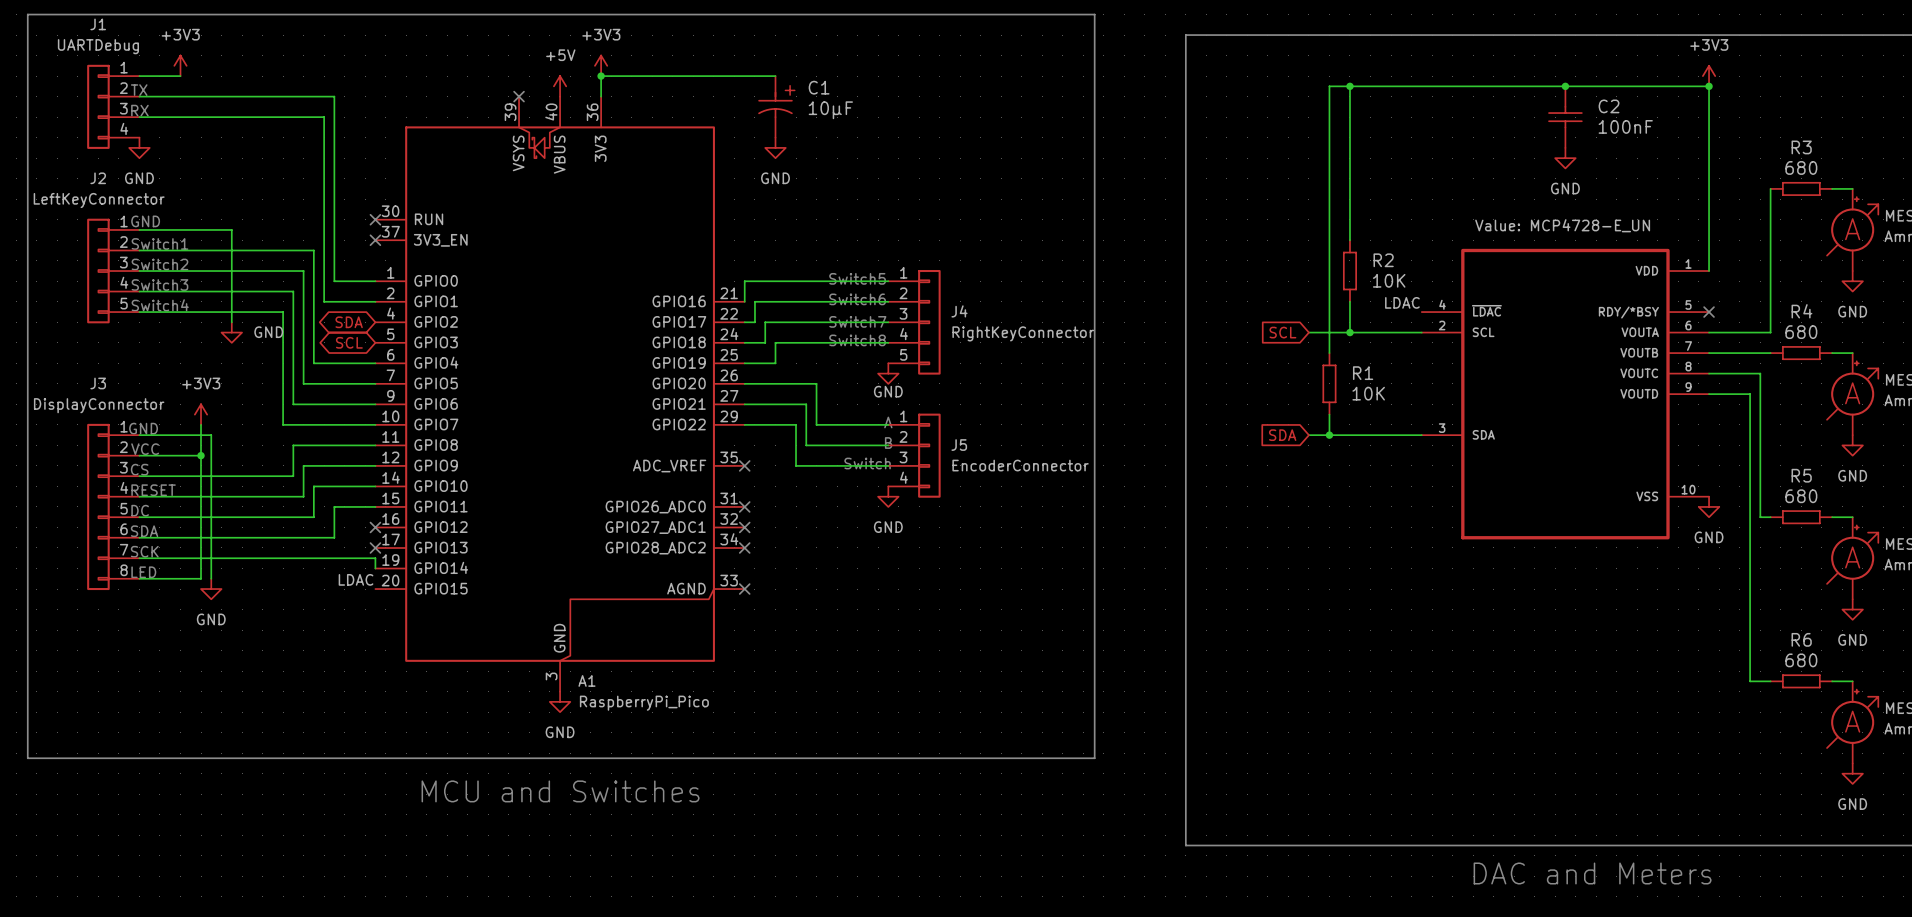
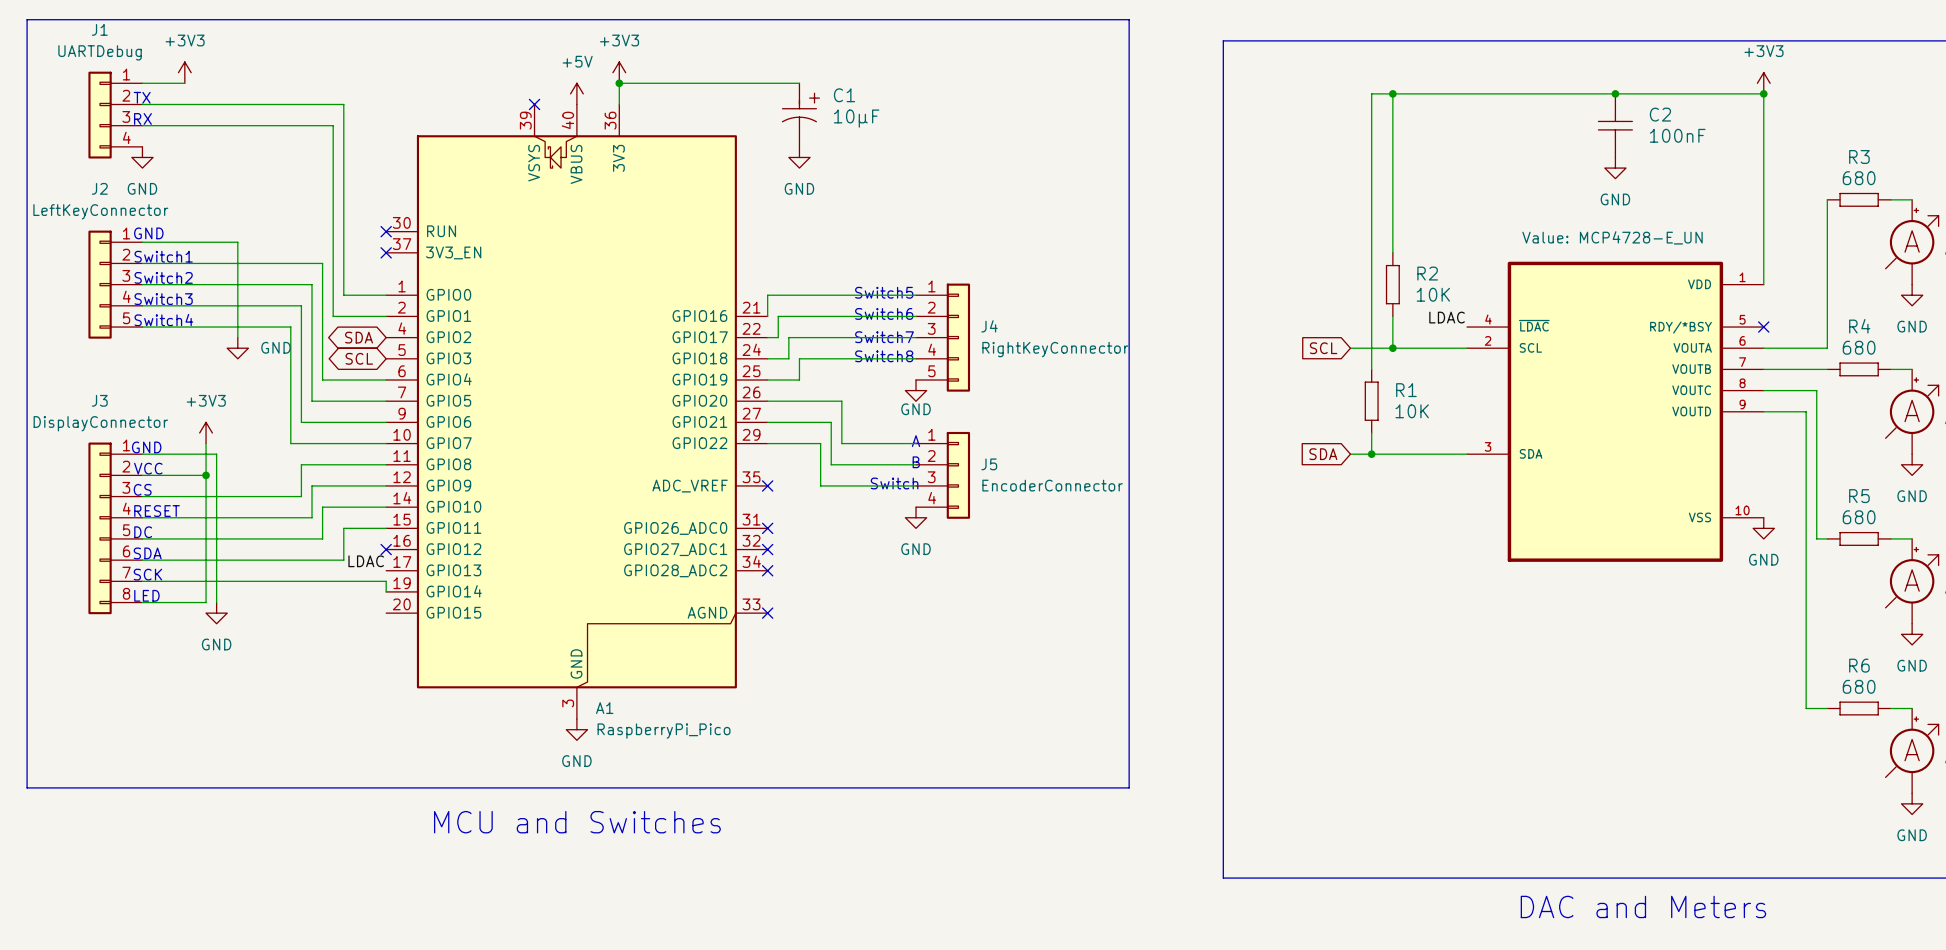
no-connect mark: (375, 547) -> none
label position: LDAC (356, 579) -> LDAC (366, 561)

